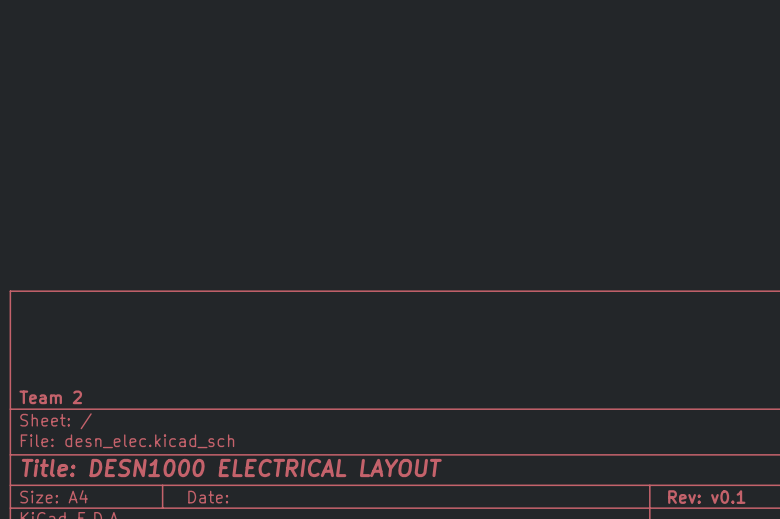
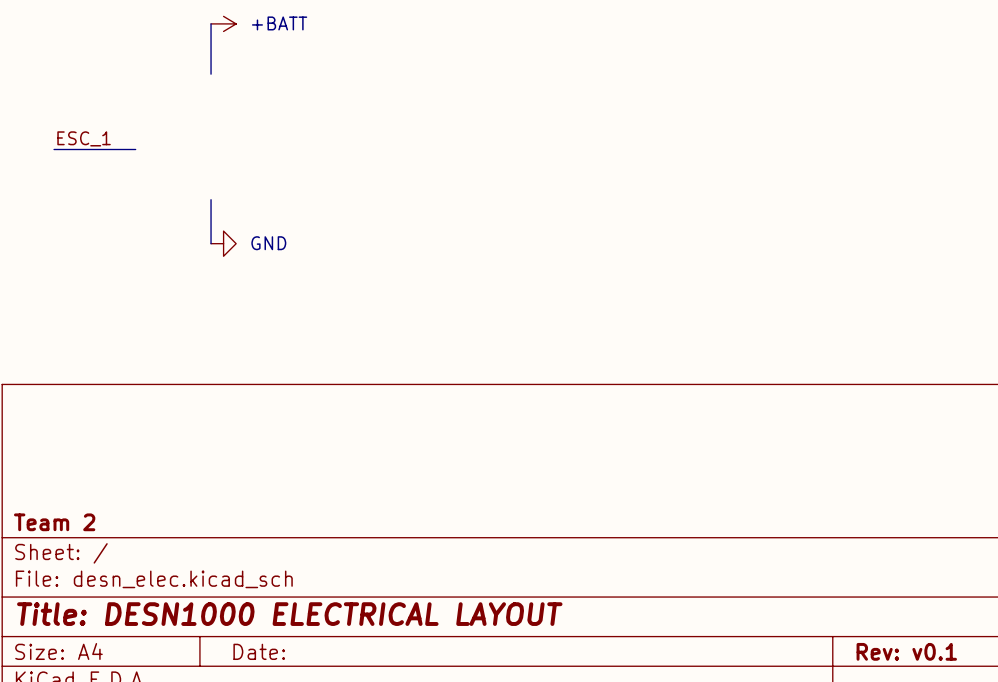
wire: none -> (211, 23) (211, 74)
power symbol: none -> +BATT (223, 23)
label: none -> ESC_1 (84, 138)
wire: none -> (54, 149) (135, 149)
wire: none -> (211, 199) (211, 243)
power symbol: none -> GND (223, 243)

